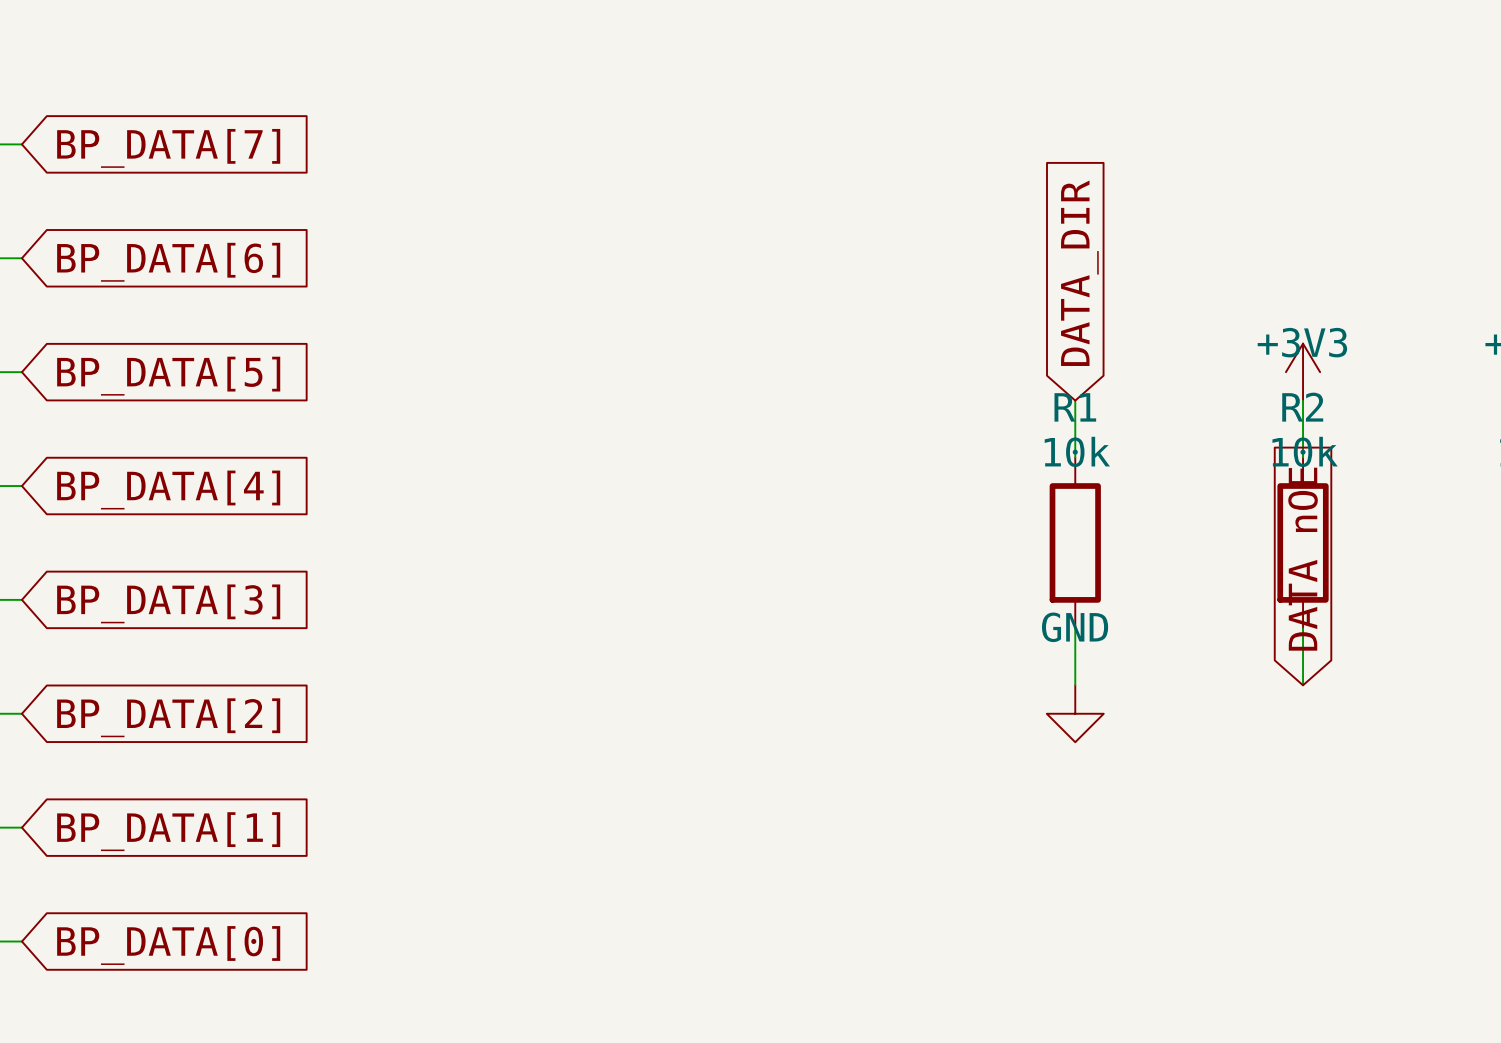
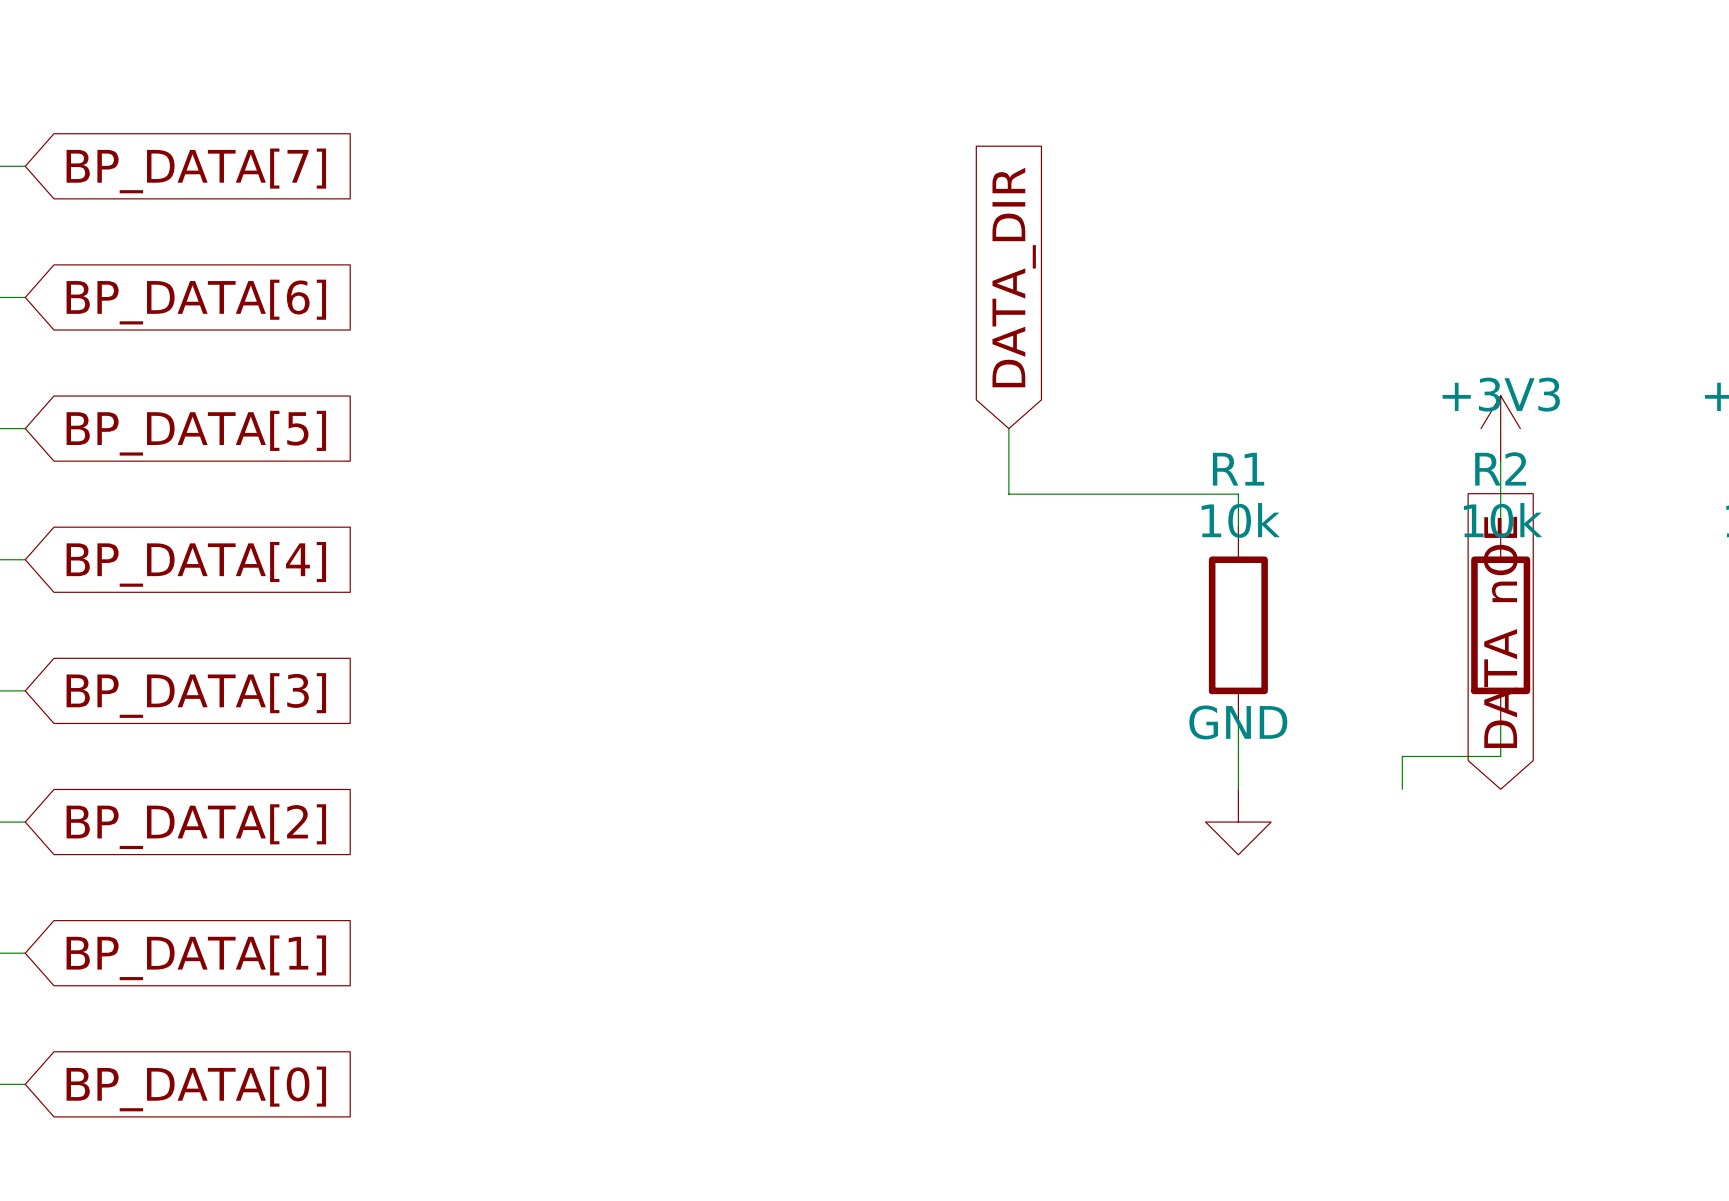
global label position: DATA_DIR (1079, 273) -> DATA_DIR (1014, 277)
wire: (1075, 400) (1075, 429) -> (1008, 428) (1008, 494) (1238, 494)
wire: (1303, 656) (1303, 685) -> (1500, 756) (1402, 756) (1402, 789)

